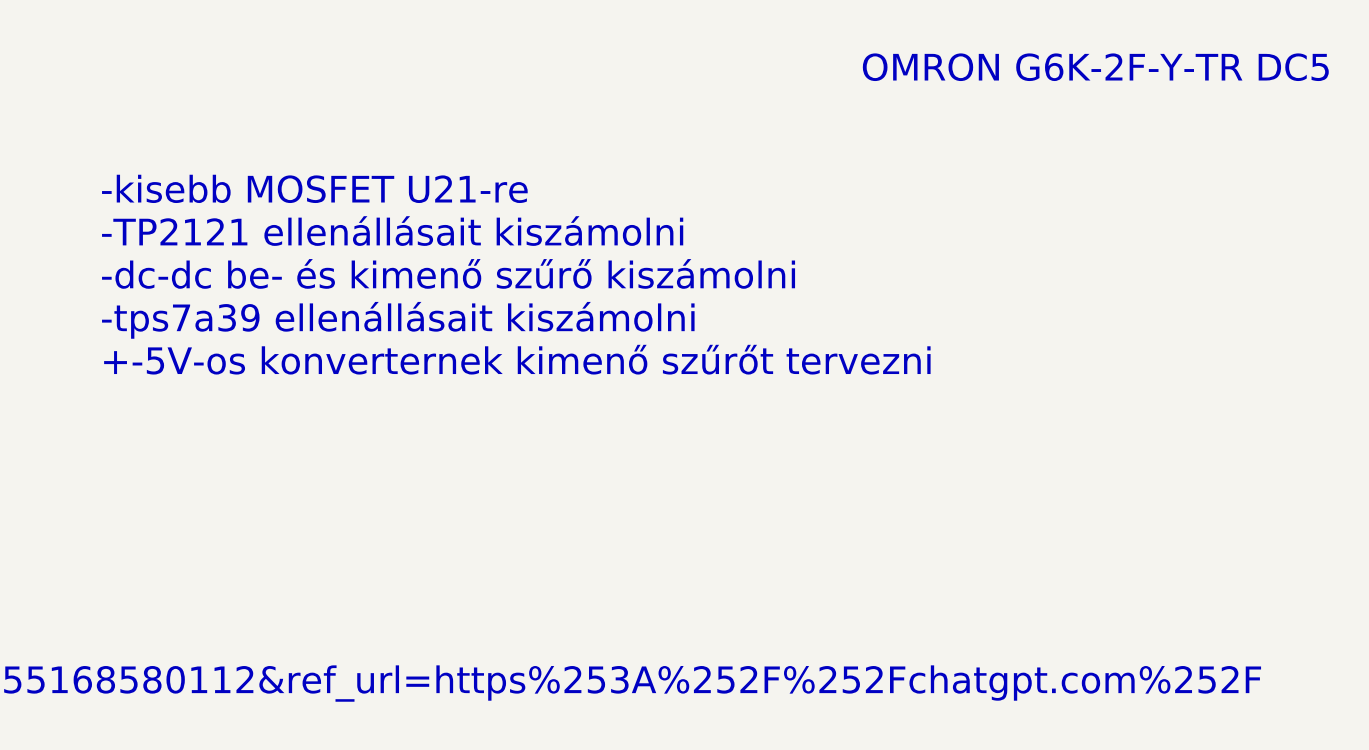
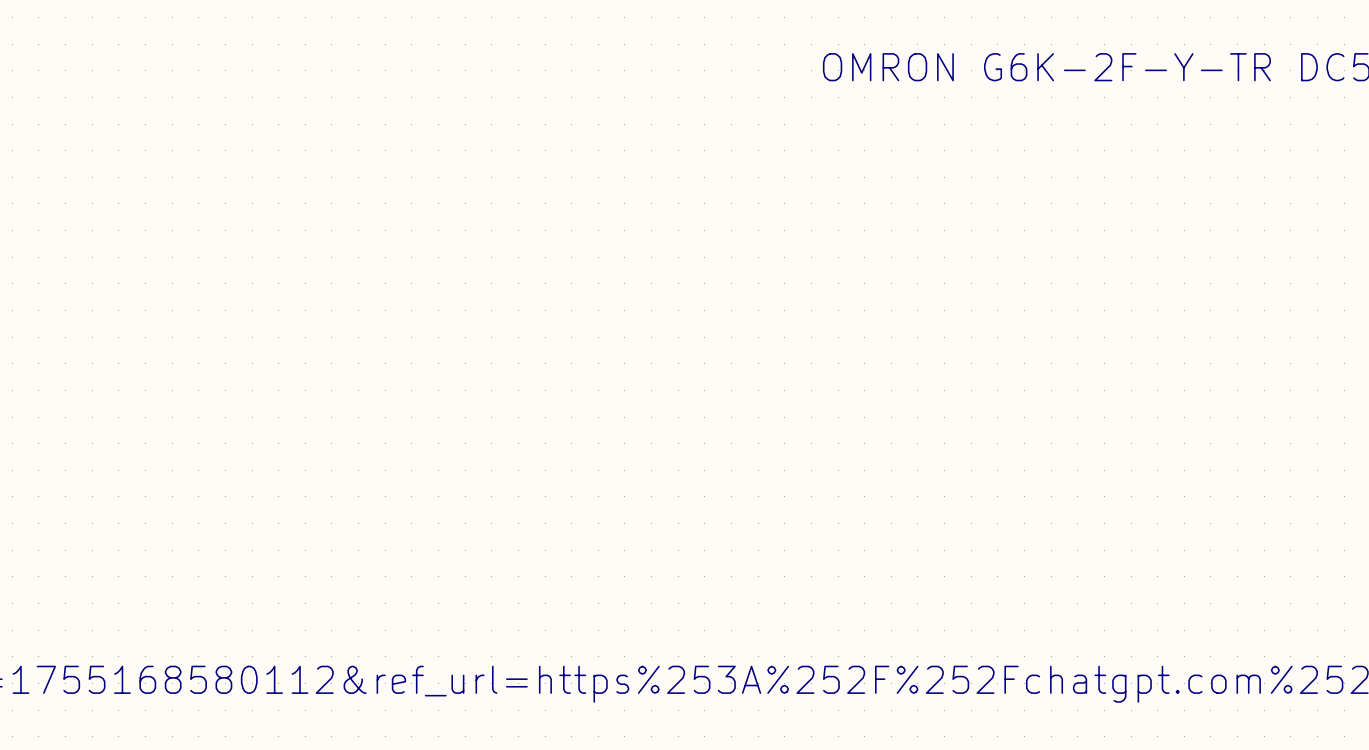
text: -kisebb MOSFET U21-re (314, 188) -> none
text: -TP2121 ellenállásait kiszámolni (392, 231) -> none
text: -dc-dc be- és kimenő szűrő kiszámolni (448, 273) -> none
text: -tps7a39 ellenállásait kiszámolni (398, 320) -> none
text: +-5V-os konverternek kimenő szűrőt tervezni (517, 359) -> none

